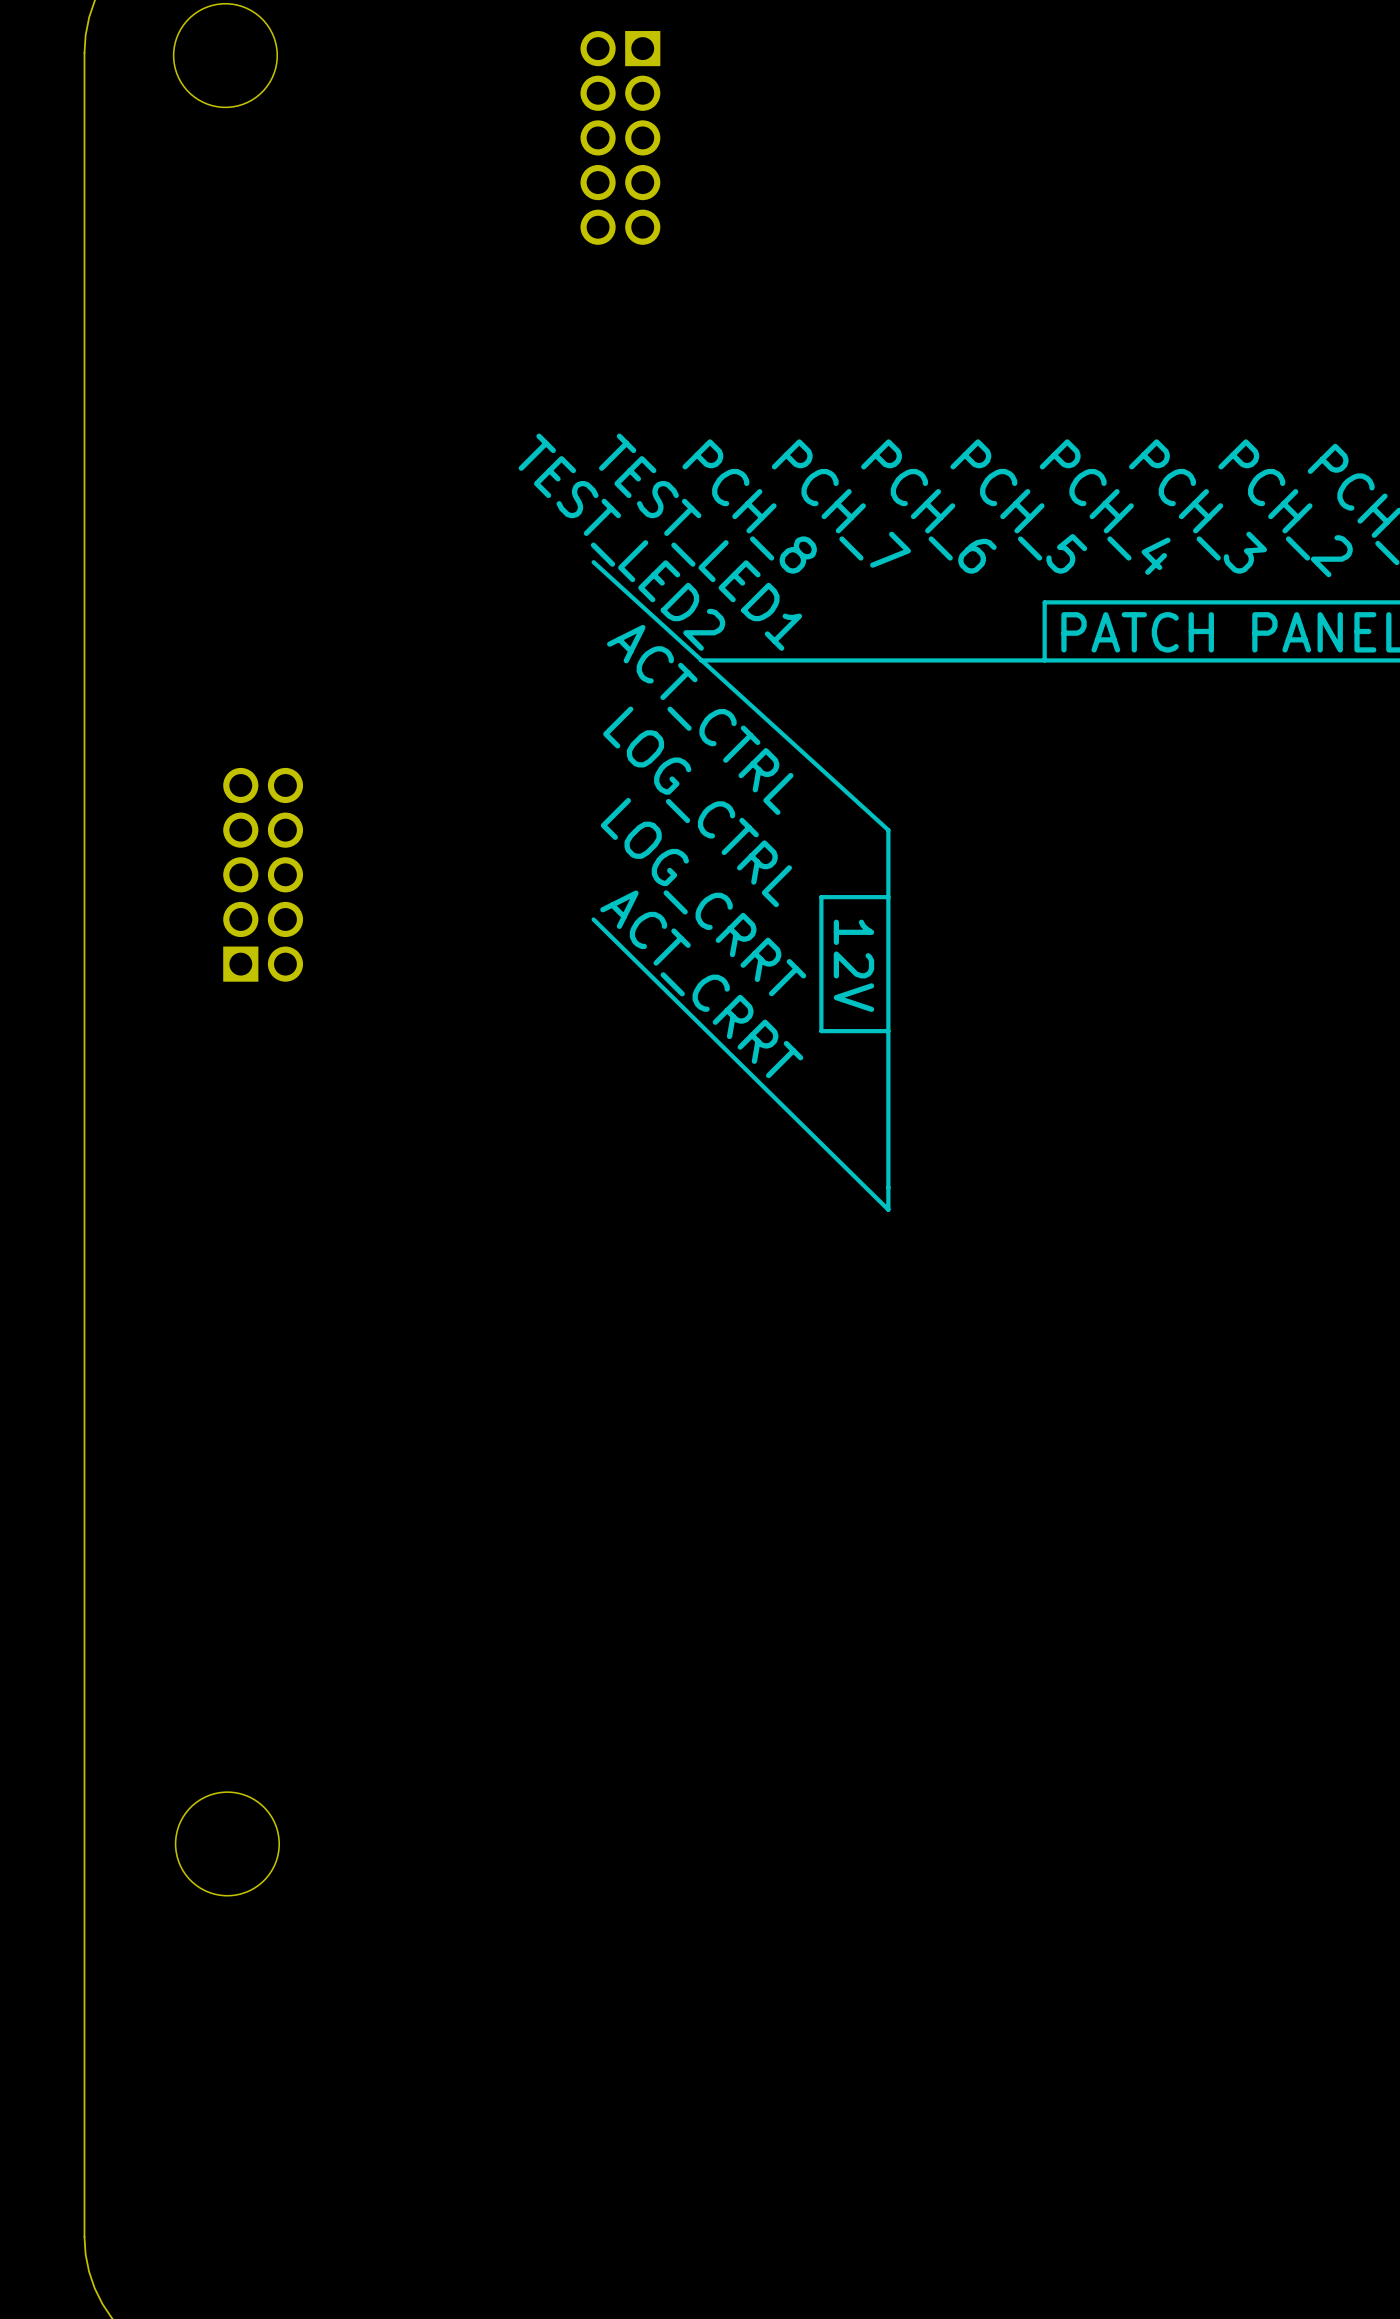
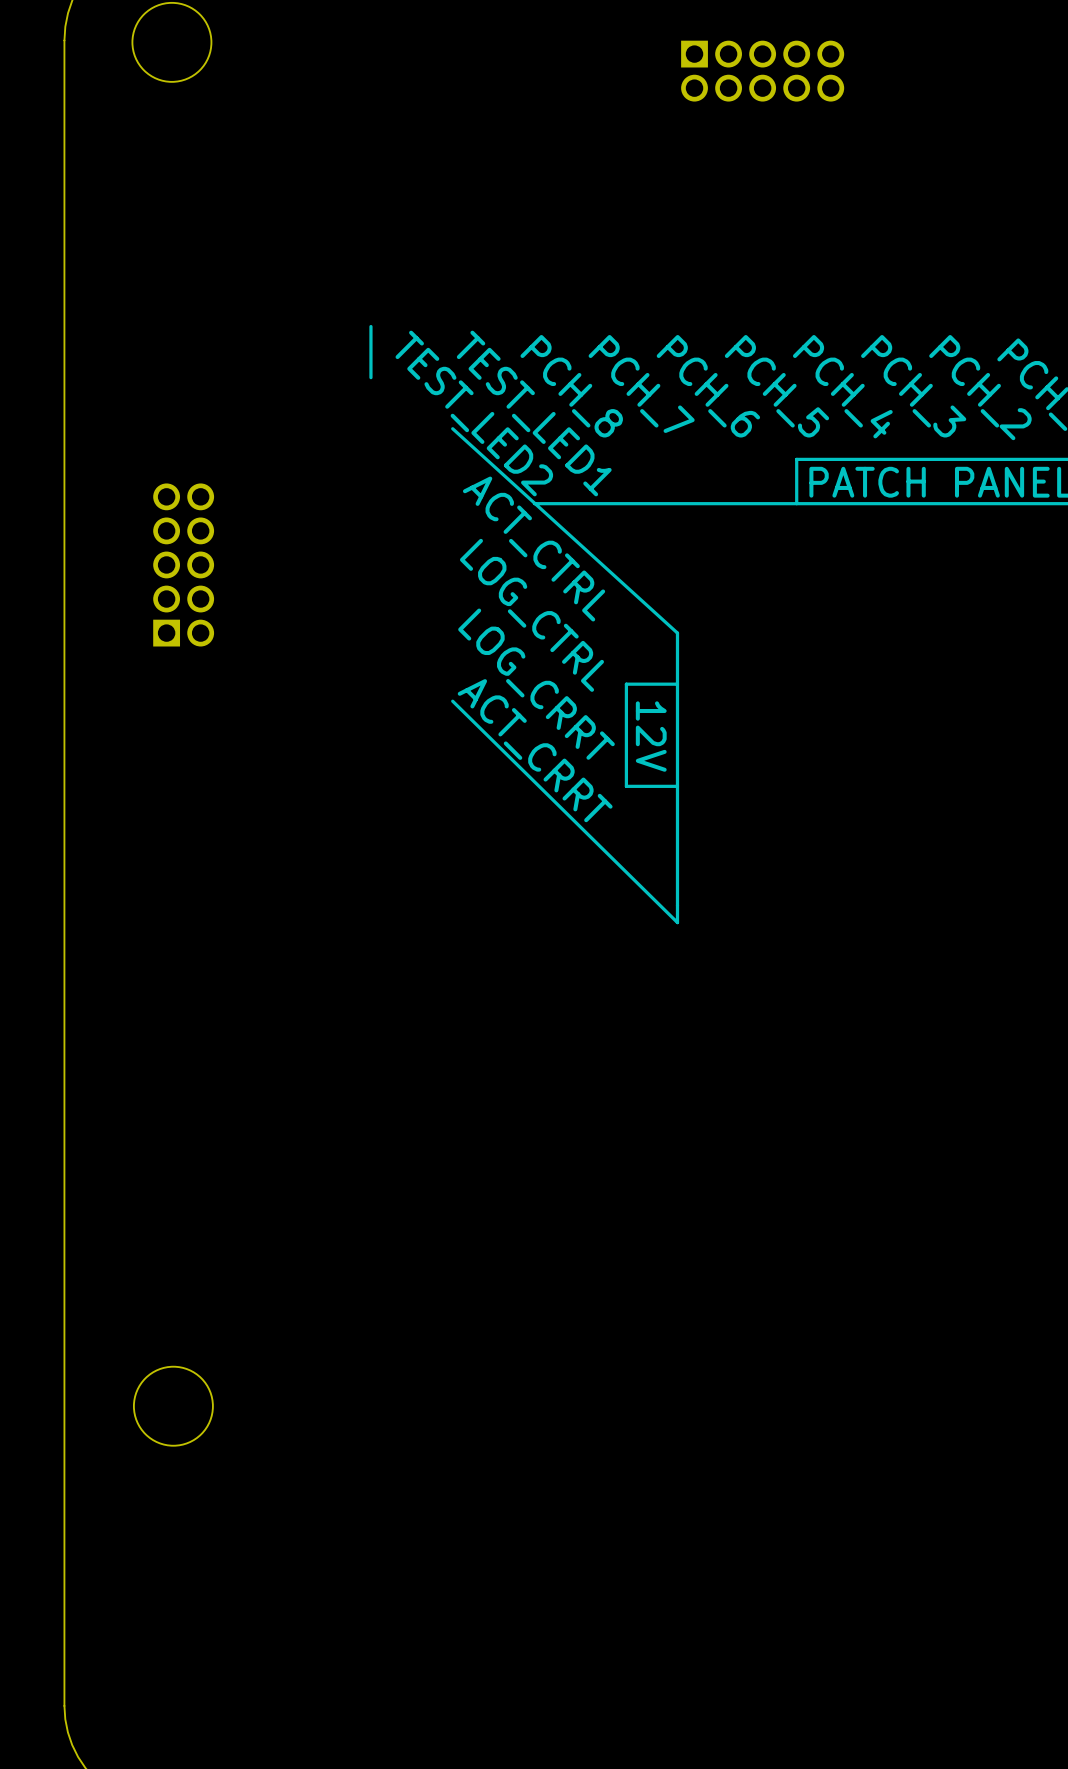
part: none -> (762, 71)
part: (620, 137) -> none
line: none -> (370, 326) (370, 377)
part position: (263, 874) -> (183, 564)

